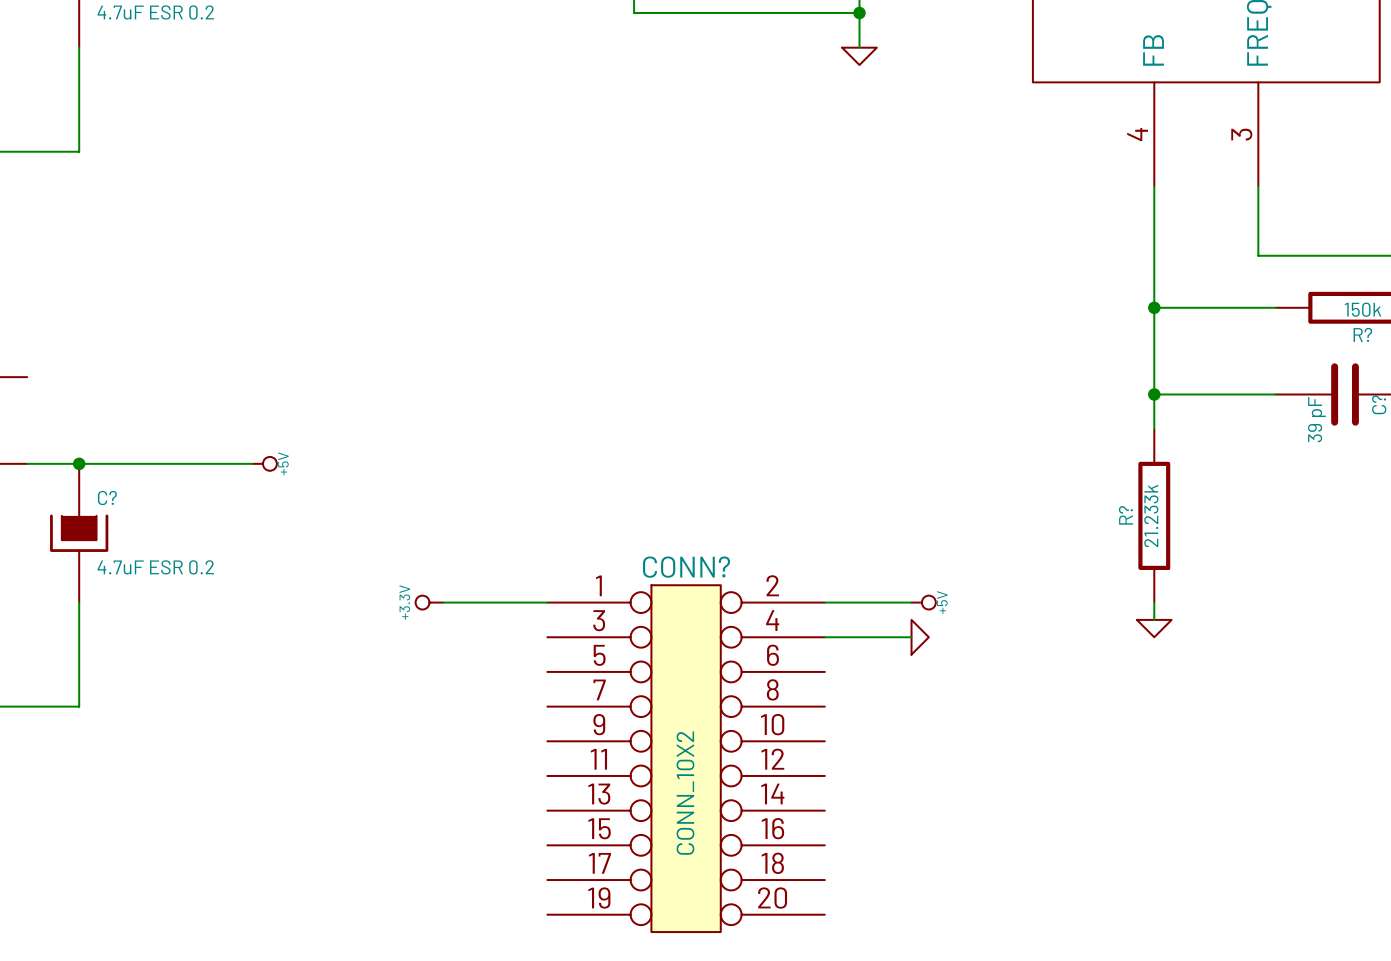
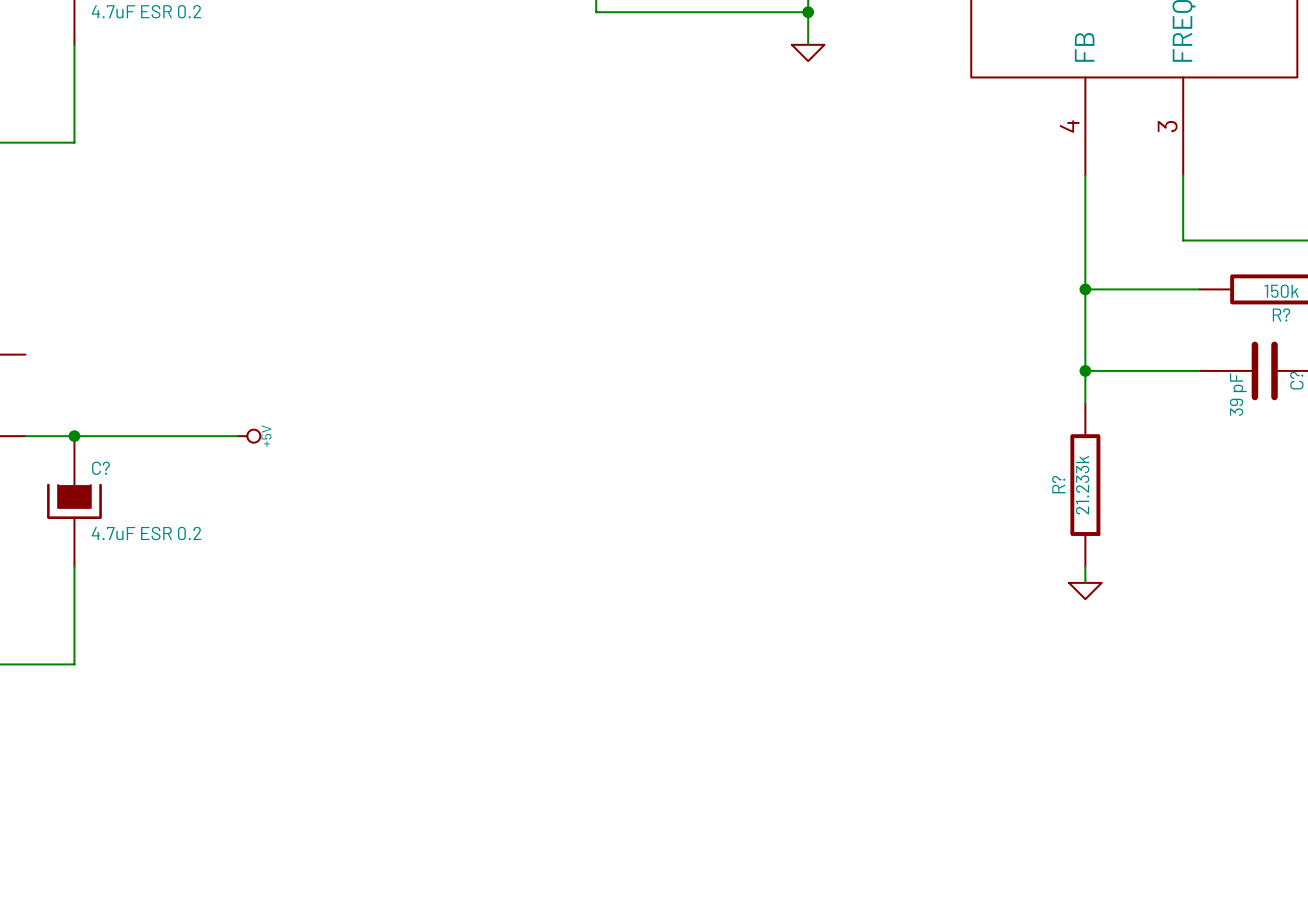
power symbol: +3.3V (429, 602) -> none
wire: (443, 602) (547, 602) -> none
wire: (824, 602) (911, 602) -> none
power symbol: +5V (923, 602) -> none
wire: (824, 637) (911, 637) -> none
power symbol: (920, 637) -> none
CONN?: CONN_10X2 (686, 758) -> none

